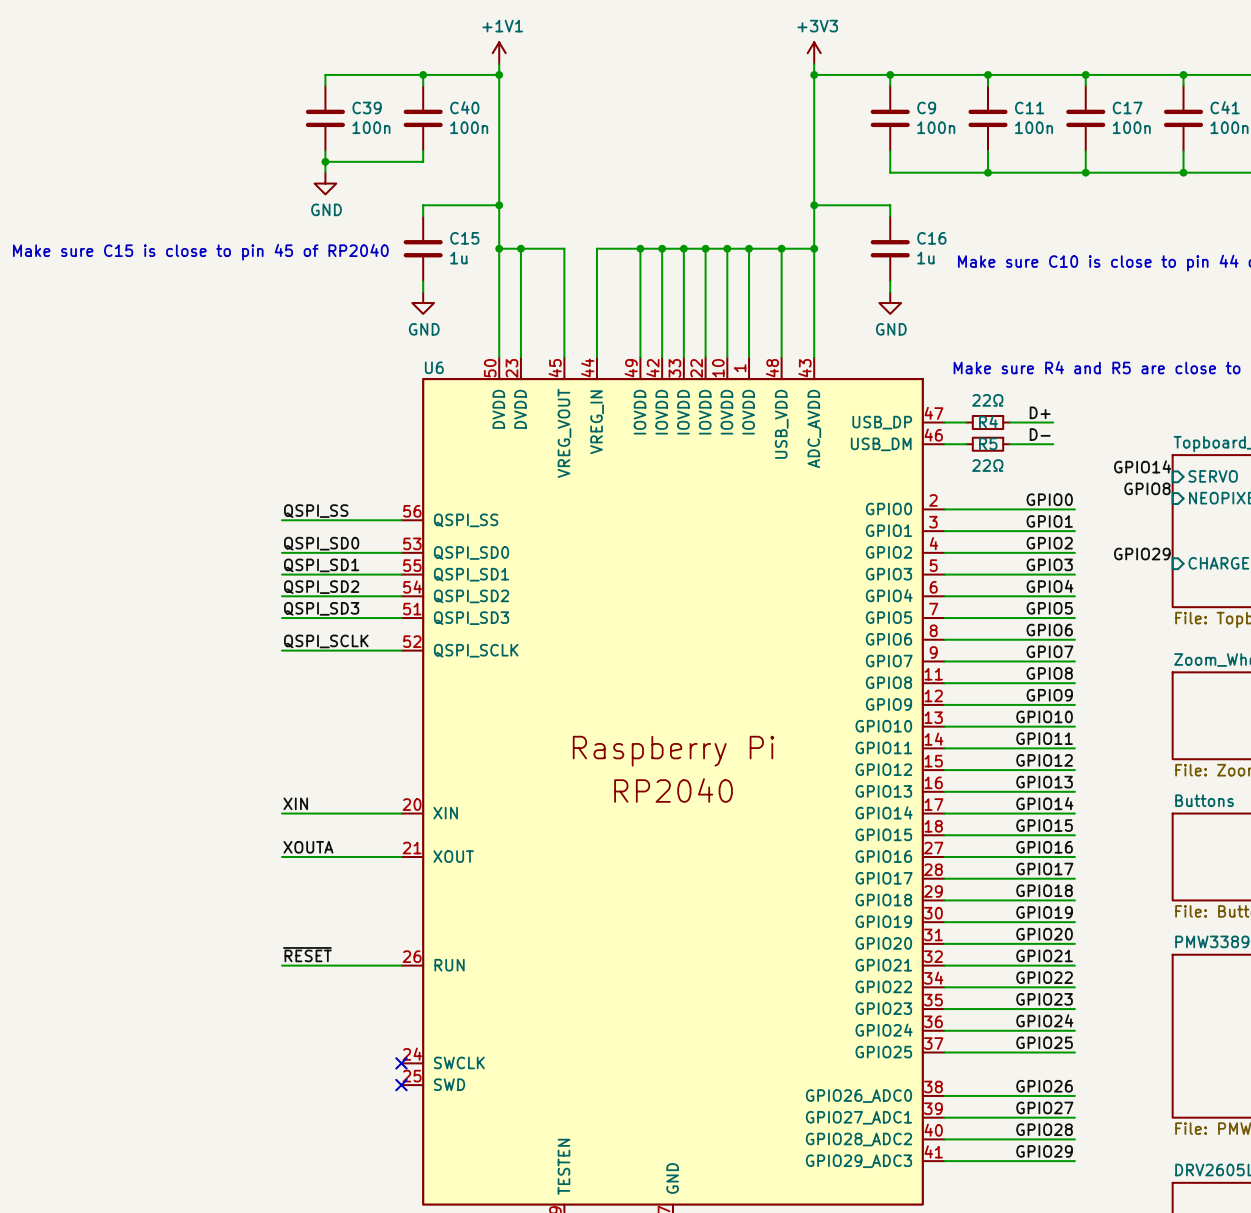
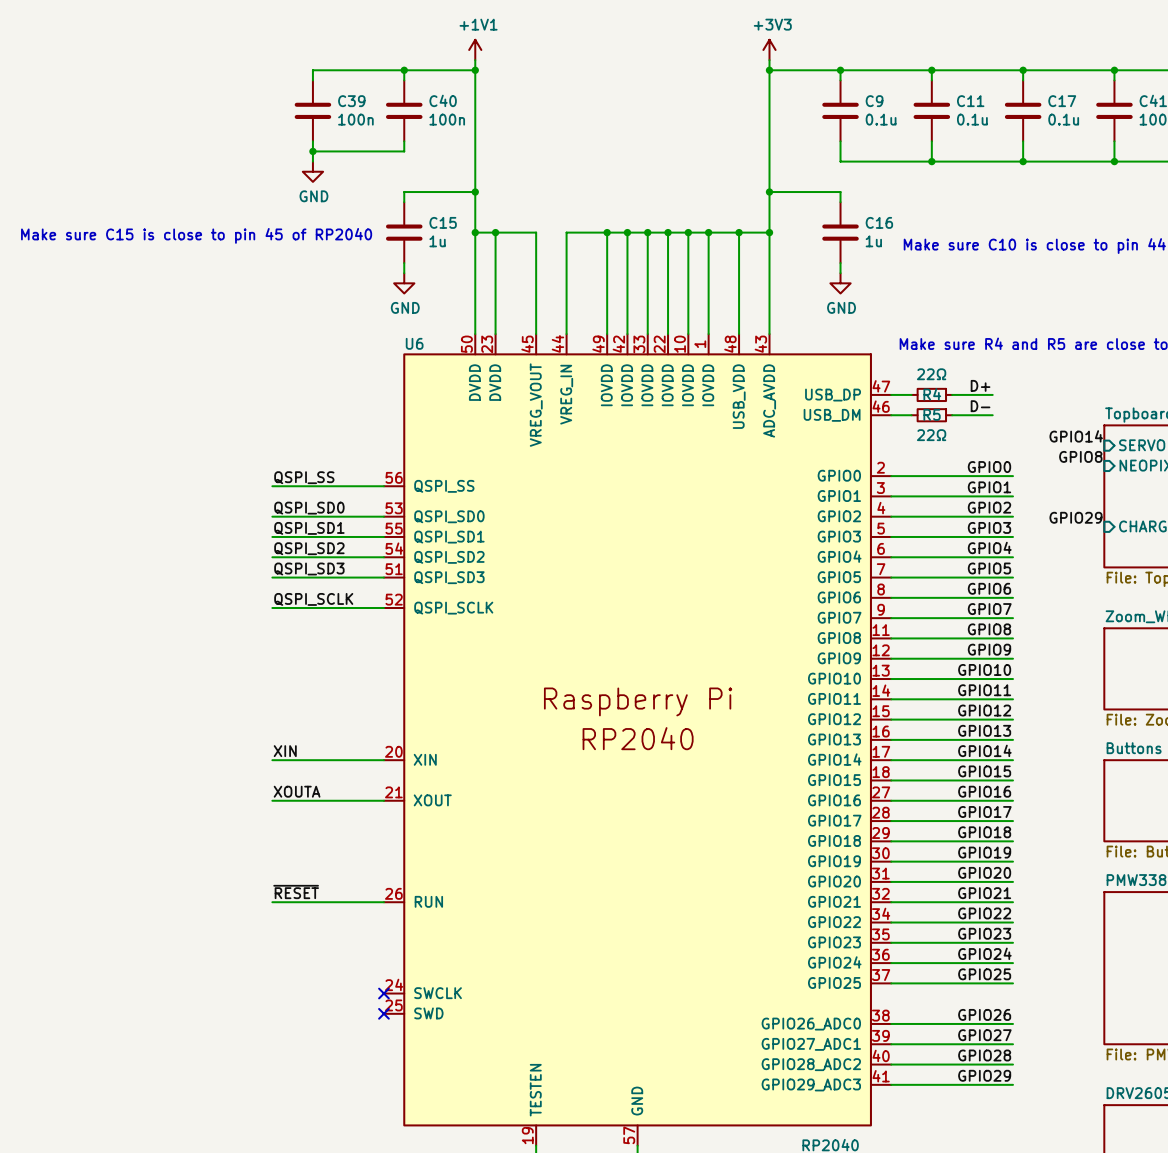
C9 value: 100n (936, 127) -> 0.1u (881, 119)
C11 value: 100n (1034, 127) -> 0.1u (972, 119)
C17 value: 100n (1131, 127) -> 0.1u (1063, 119)

